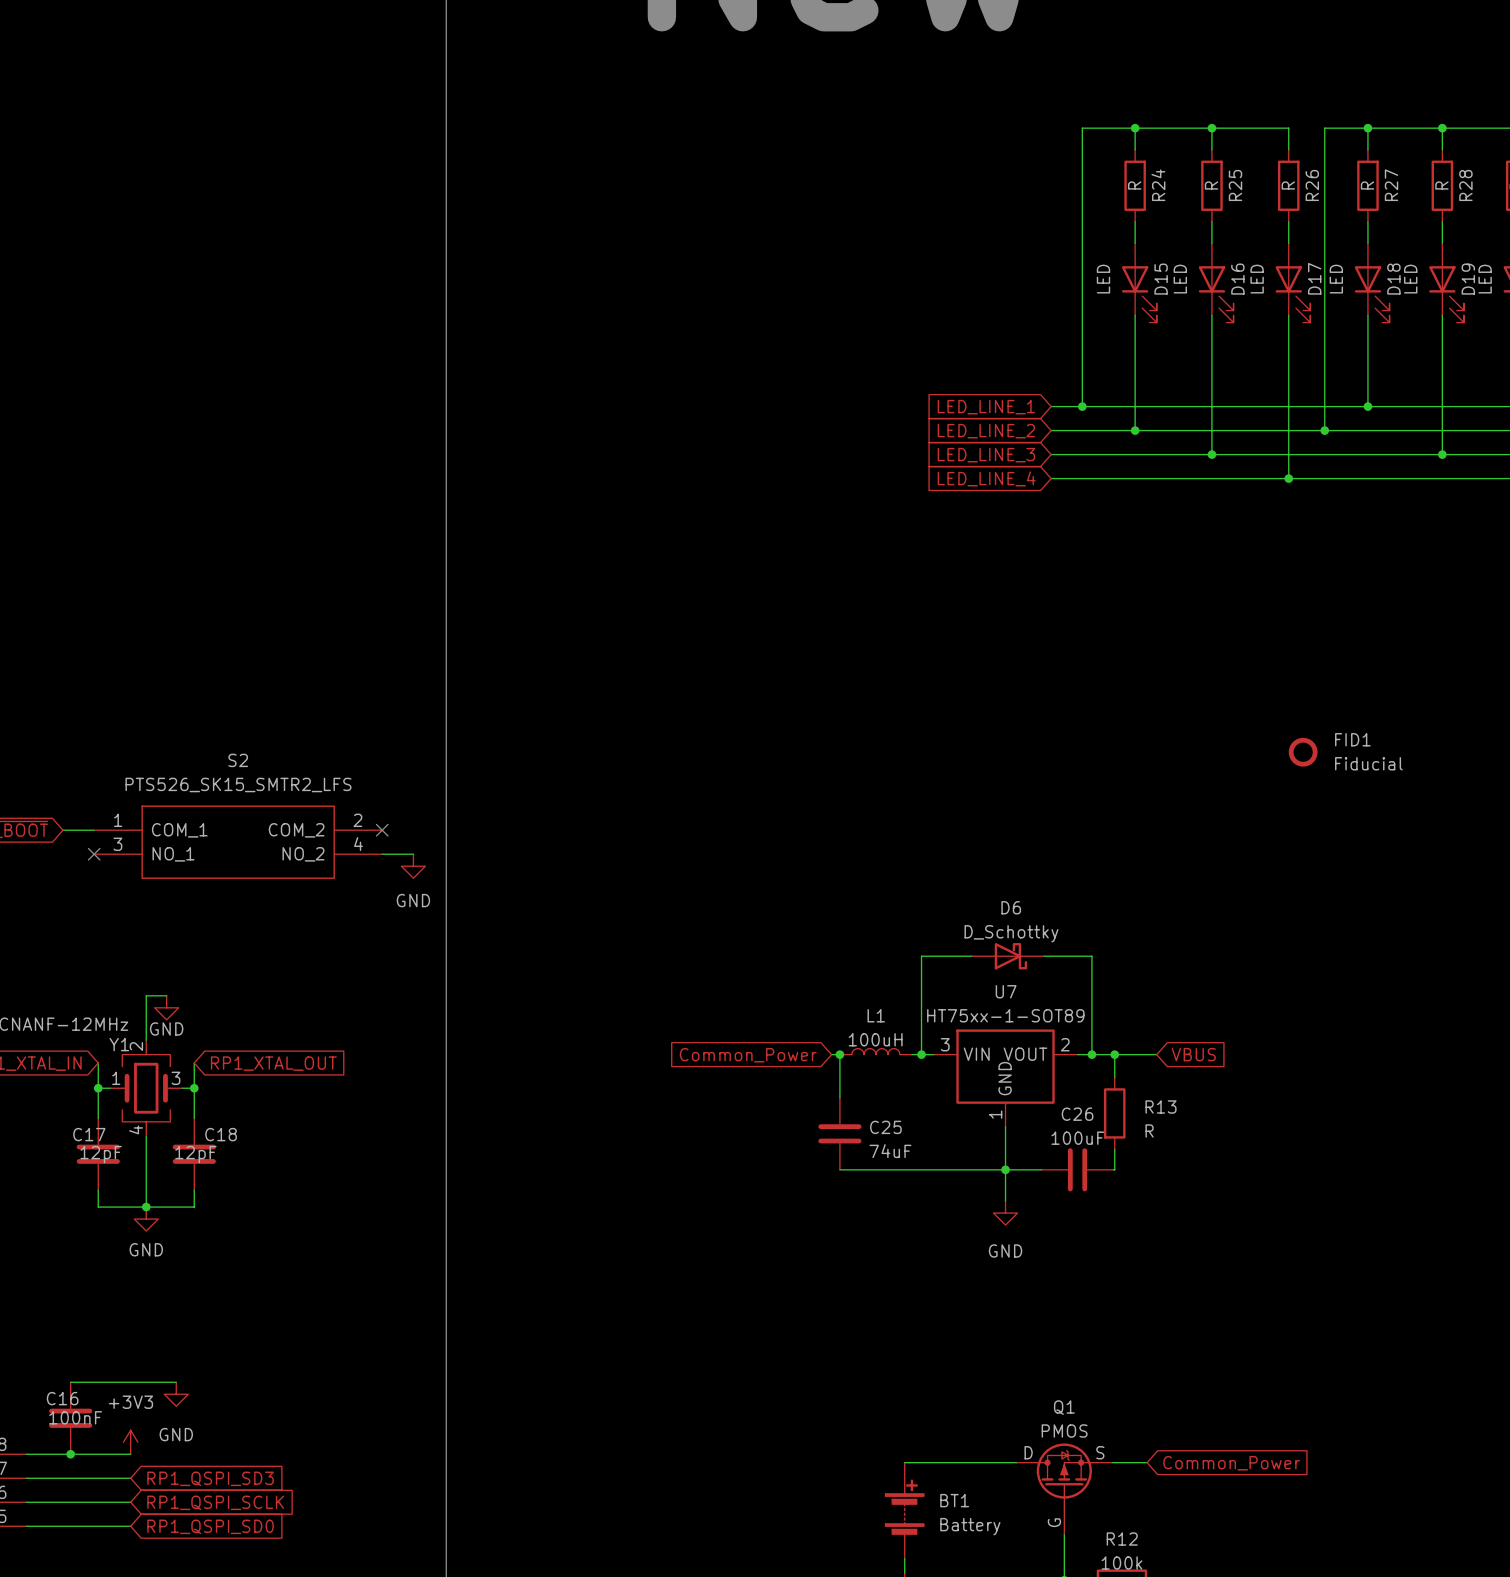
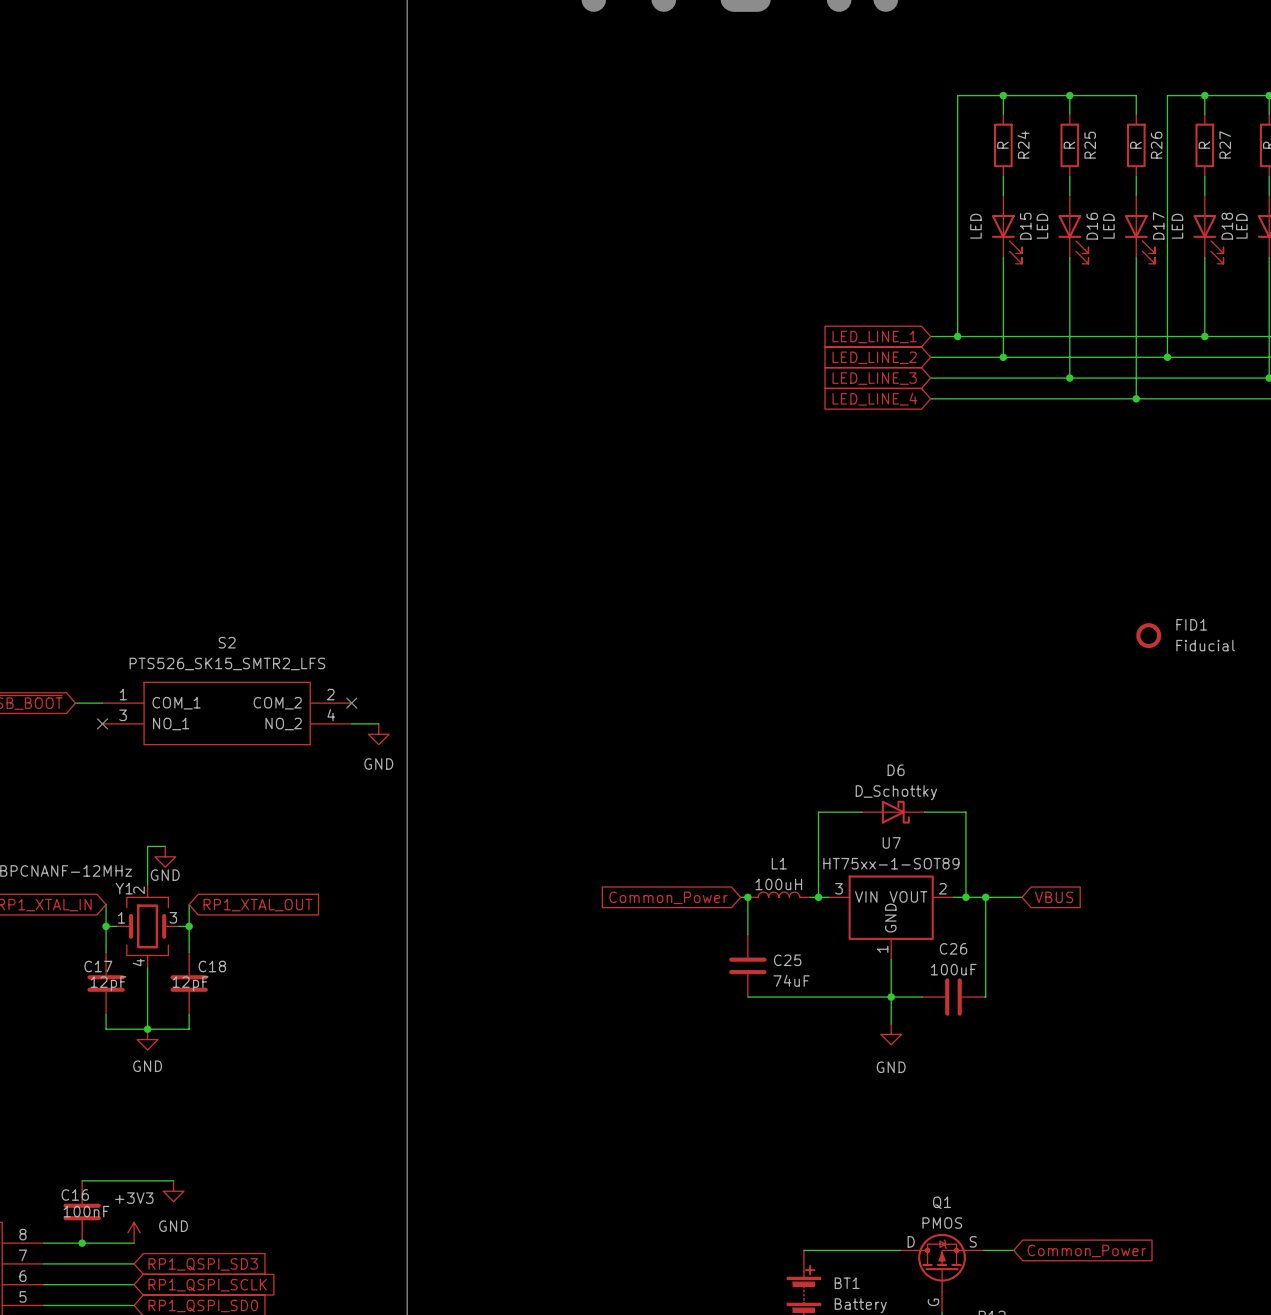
wire: none -> (985, 917) (985, 979)
R13: R (1114, 1113) -> none

